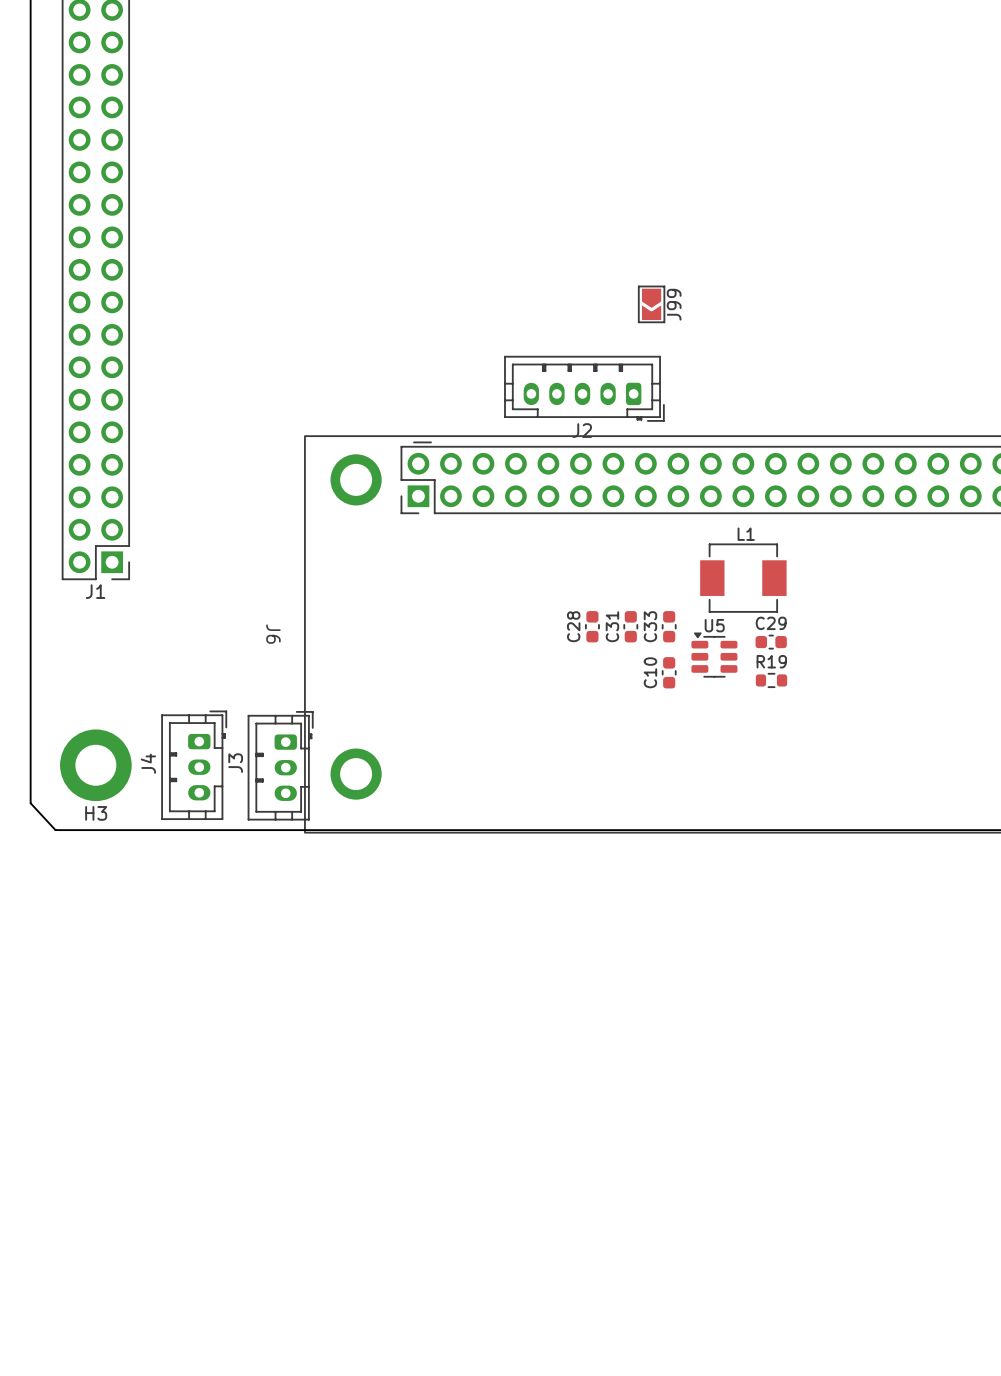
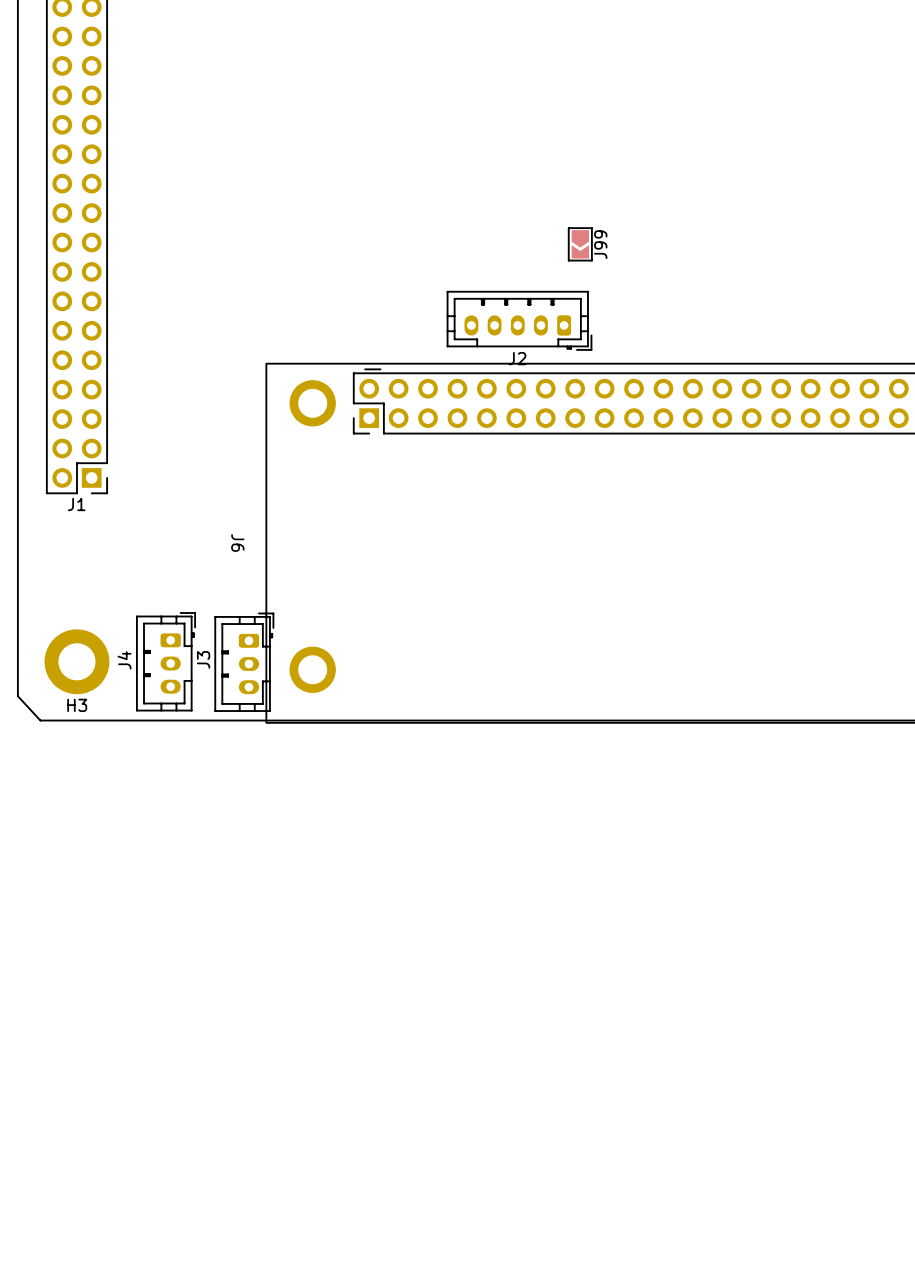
L1: (743, 578) -> none
C28: (592, 626) -> none
C31: (630, 626) -> none
C33: (669, 626) -> none
C29: (771, 642) -> none
U5: (714, 655) -> none
C10: (669, 672) -> none
R19: (771, 680) -> none

